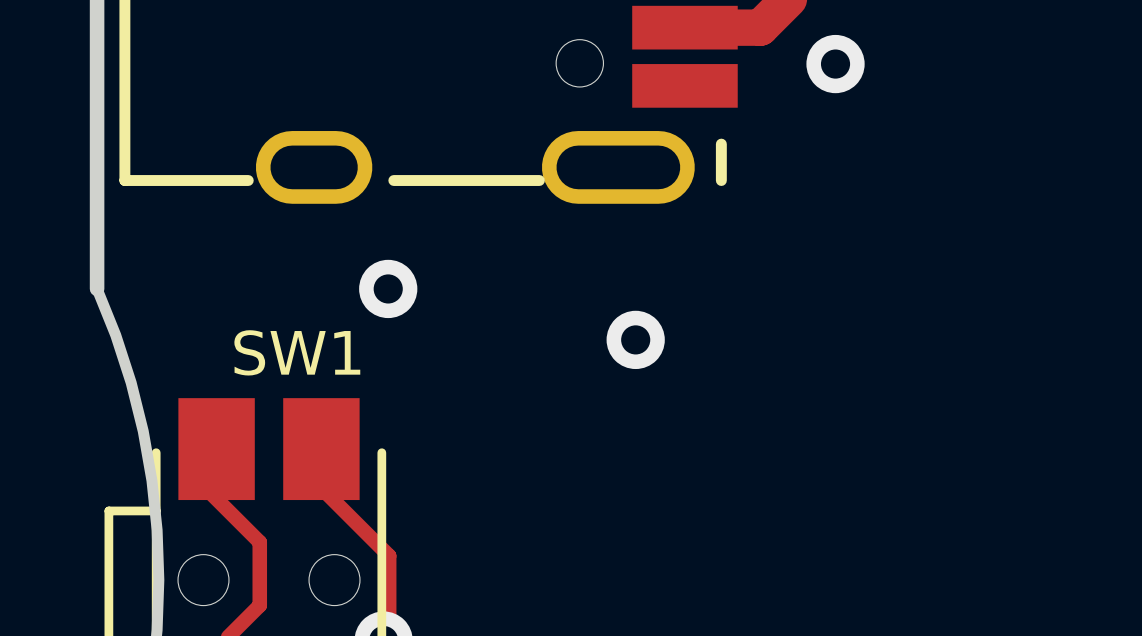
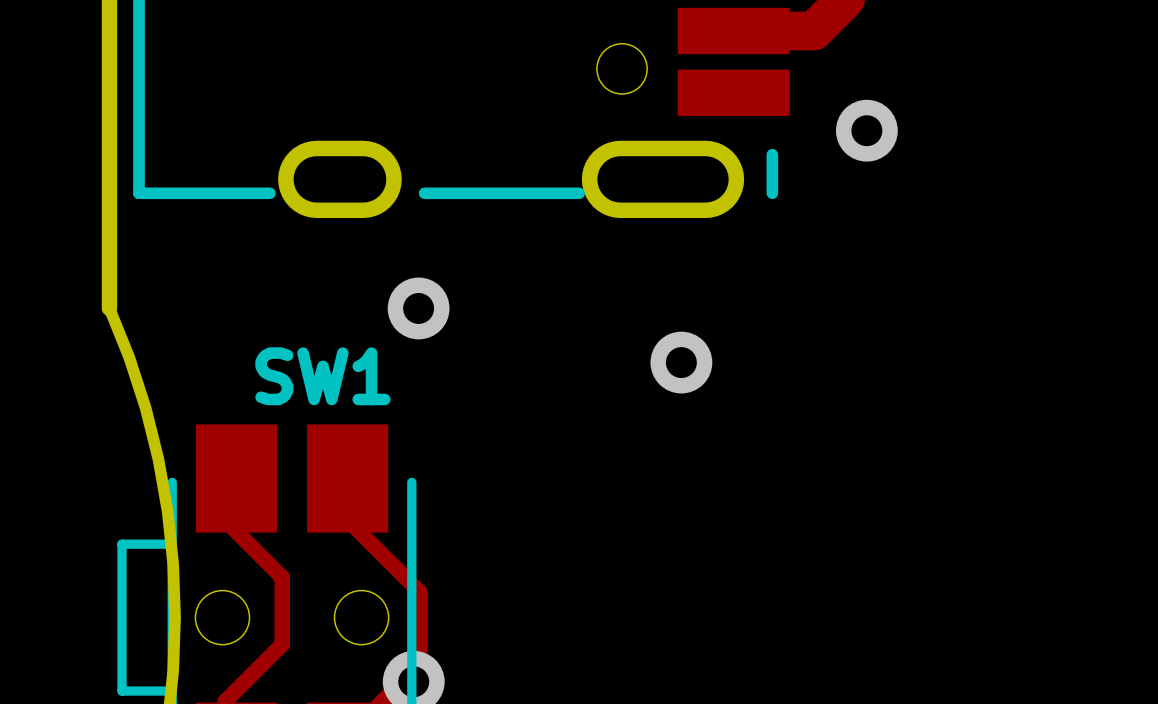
via position: (835, 64) -> (866, 130)

